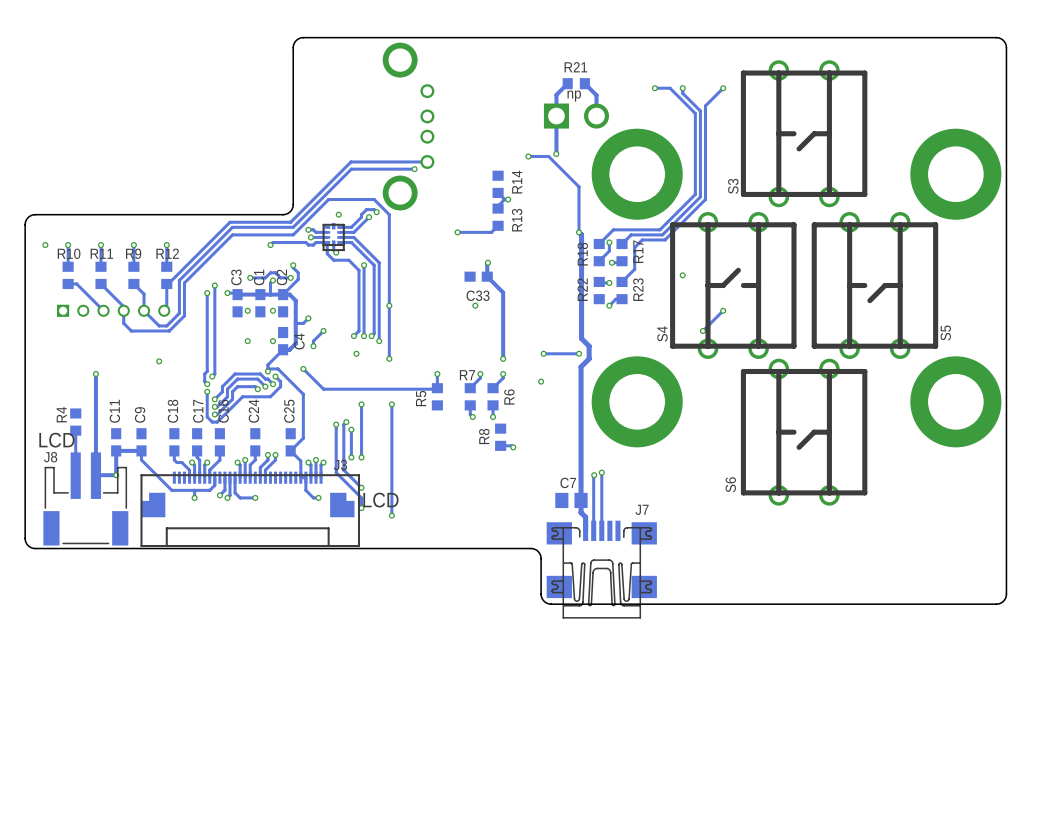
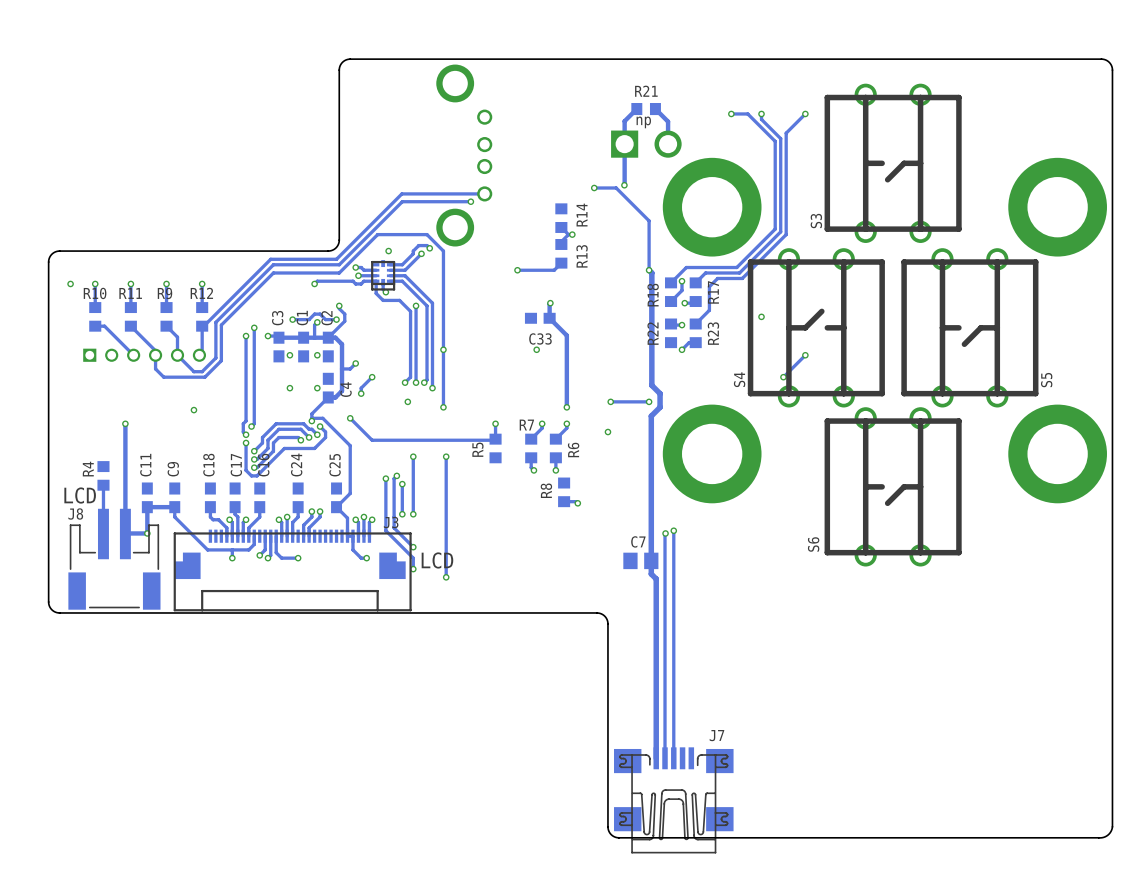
track: none -> (656, 593) (656, 758)
track: none -> (665, 593) (665, 758)
track: none -> (673, 593) (673, 758)
J7 position: (601, 569) -> (673, 800)
board edge: (1006, 594) (1003, 601) (996, 604) (551, 604) (544, 601) (541, 594) -> (1112, 662) (1112, 826) (1107, 835) (1100, 837) (614, 836) (610, 833) (607, 826) (607, 662)

